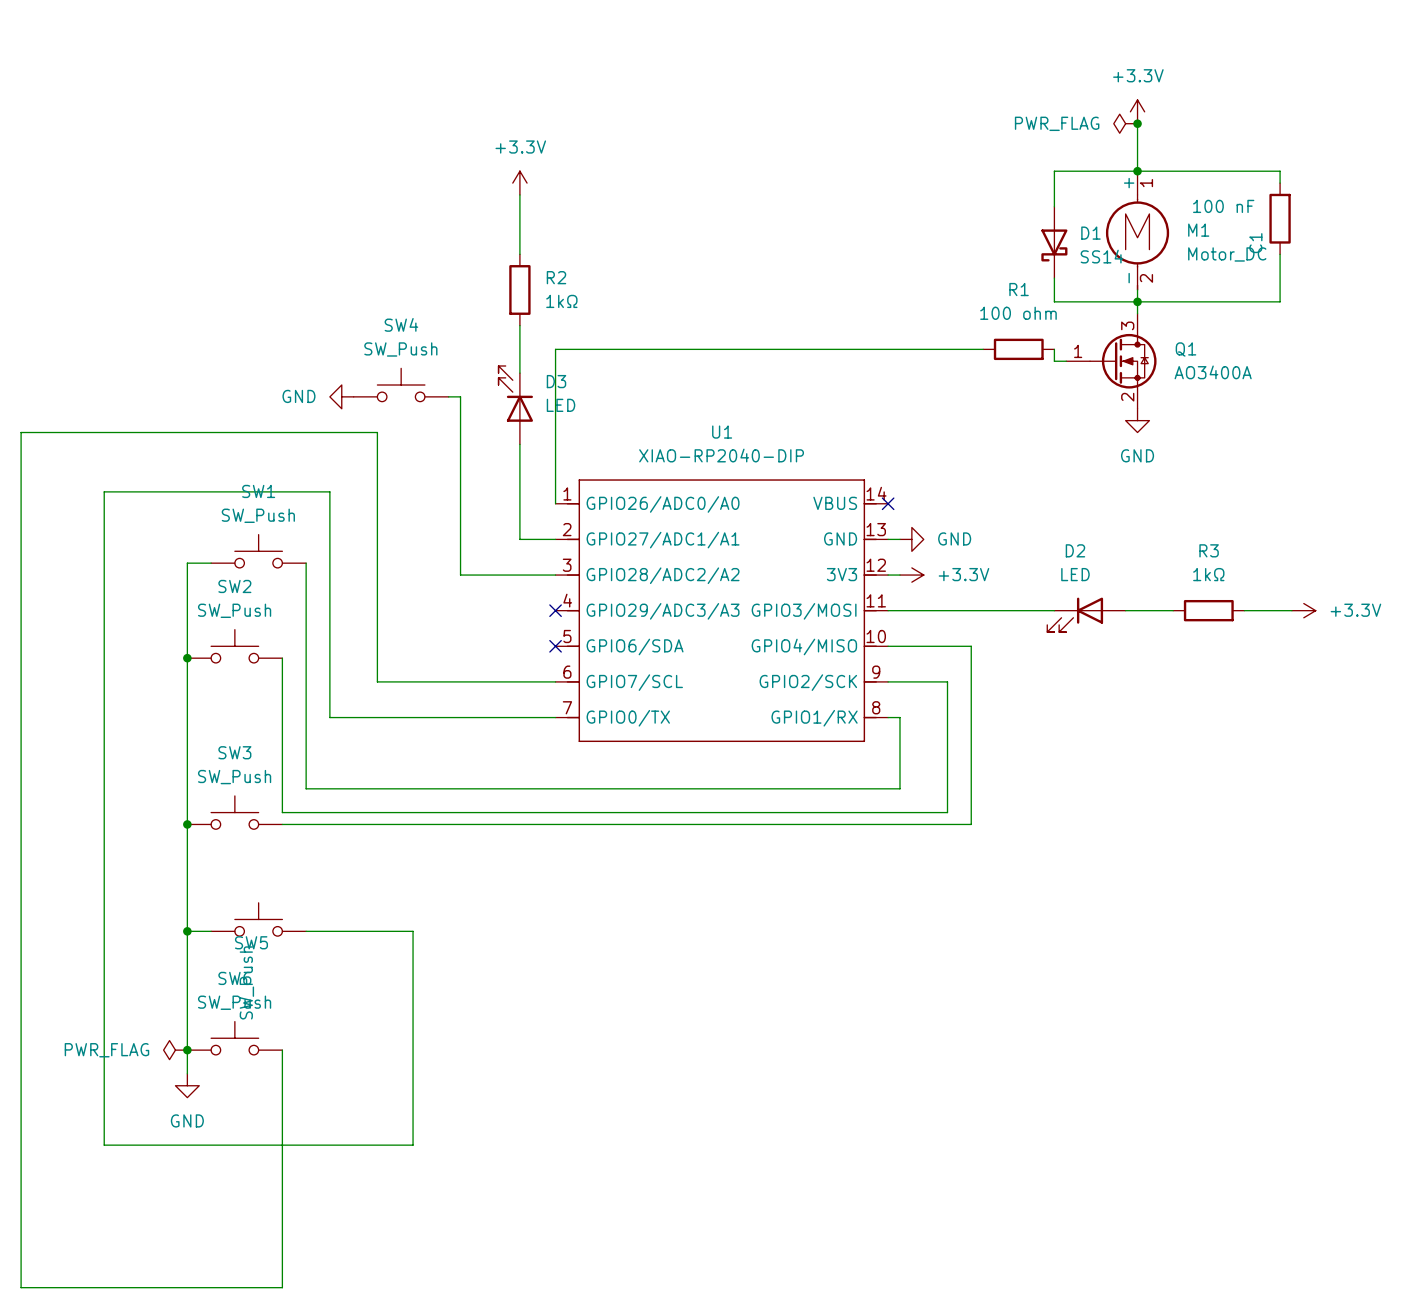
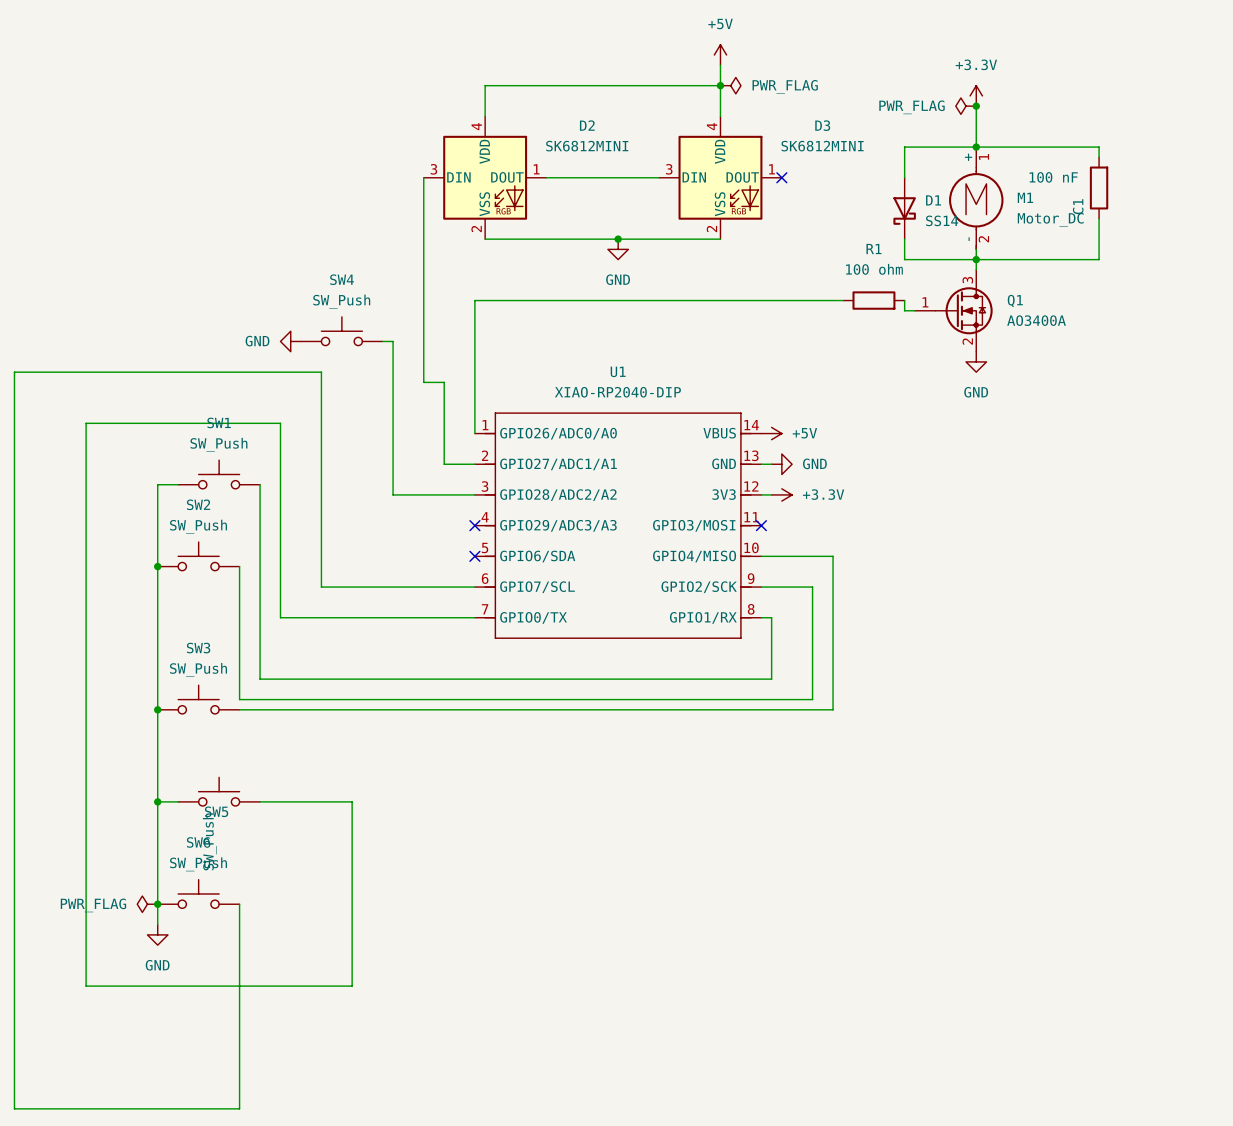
power symbol: none -> +5V (720, 54)
wire: none -> (720, 65) (720, 116)
wire: none -> (720, 85) (485, 85) (485, 116)
junction: none -> (720, 85)
power symbol: none -> PWR_FLAG (730, 85)
power symbol: +3.3V (519, 183) -> none
wire: none -> (423, 177) (423, 382) (444, 382)
wire: none -> (546, 177) (659, 177)
no-connect mark: none -> (781, 177)
wire: none -> (485, 239) (720, 239)
junction: none -> (618, 239)
R2: 1kΩ (519, 289) -> none
power symbol: none -> GND (618, 249)
wire: (519, 325) (519, 373) -> none
D3 symbol: [498, 366, 533, 445] -> [659, 116, 782, 240]
D3 name position: D3 (556, 381) -> D3 (822, 125)
D3 value: LED (561, 405) -> SK6812MINI (822, 146)
no-connect mark: (888, 503) -> none
power symbol: none -> +5V (771, 433)
D2 name position: D2 (1075, 550) -> D2 (587, 125)
D2 value: LED (1075, 574) -> SK6812MINI (587, 146)
D2 symbol: [1047, 597, 1126, 633] -> [423, 116, 547, 240]
wire: (888, 610) (1054, 610) -> none
no-connect mark: none -> (761, 525)
wire: (1125, 610) (1173, 610) -> none
R3: 1kΩ (1208, 610) -> none
wire: (1244, 610) (1291, 610) -> none
power symbol: +3.3V (1303, 610) -> none

